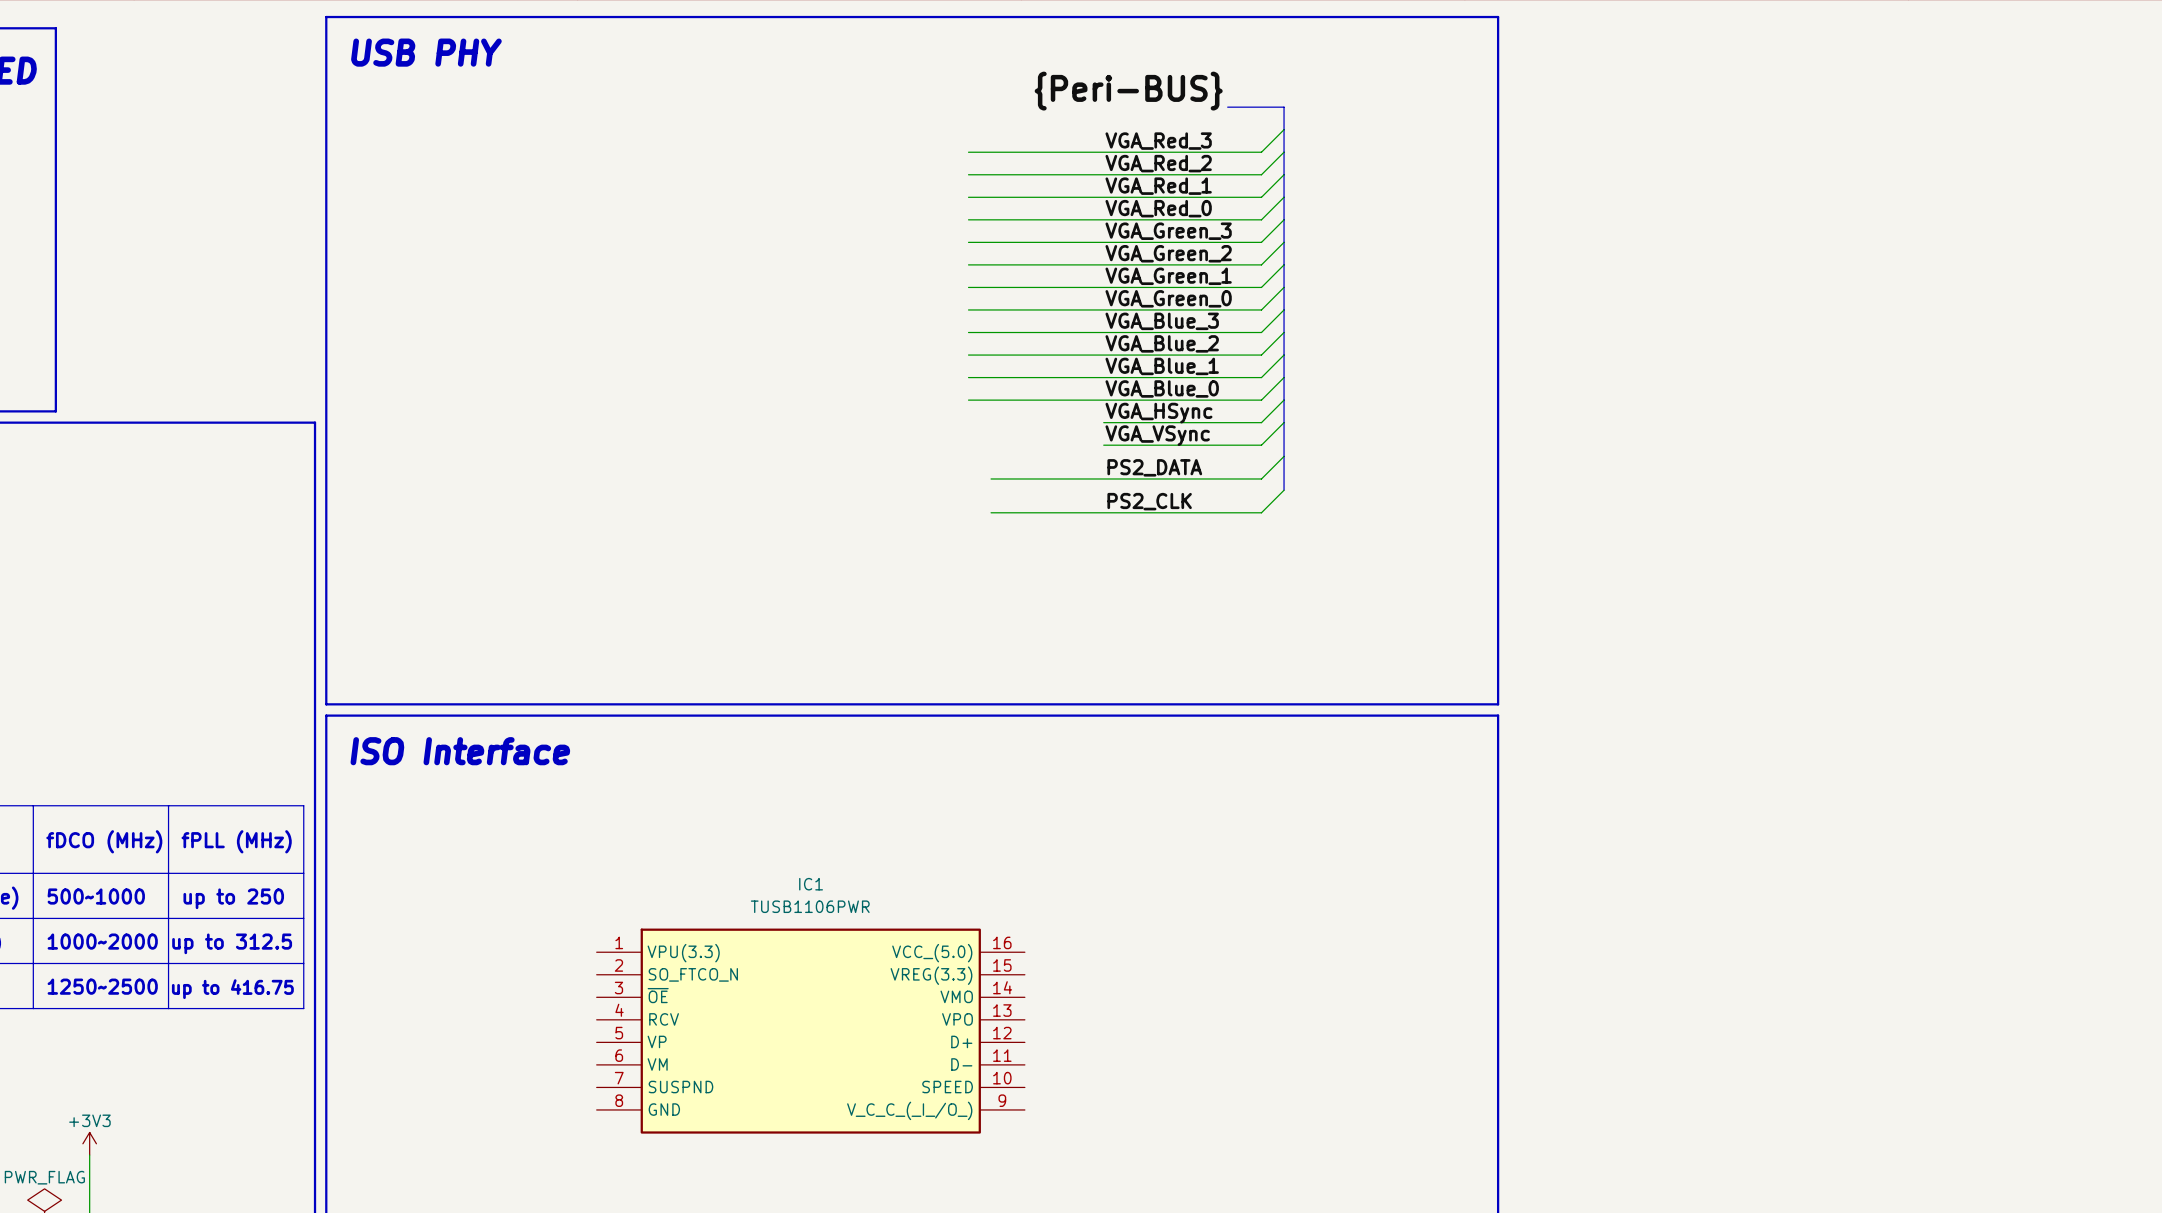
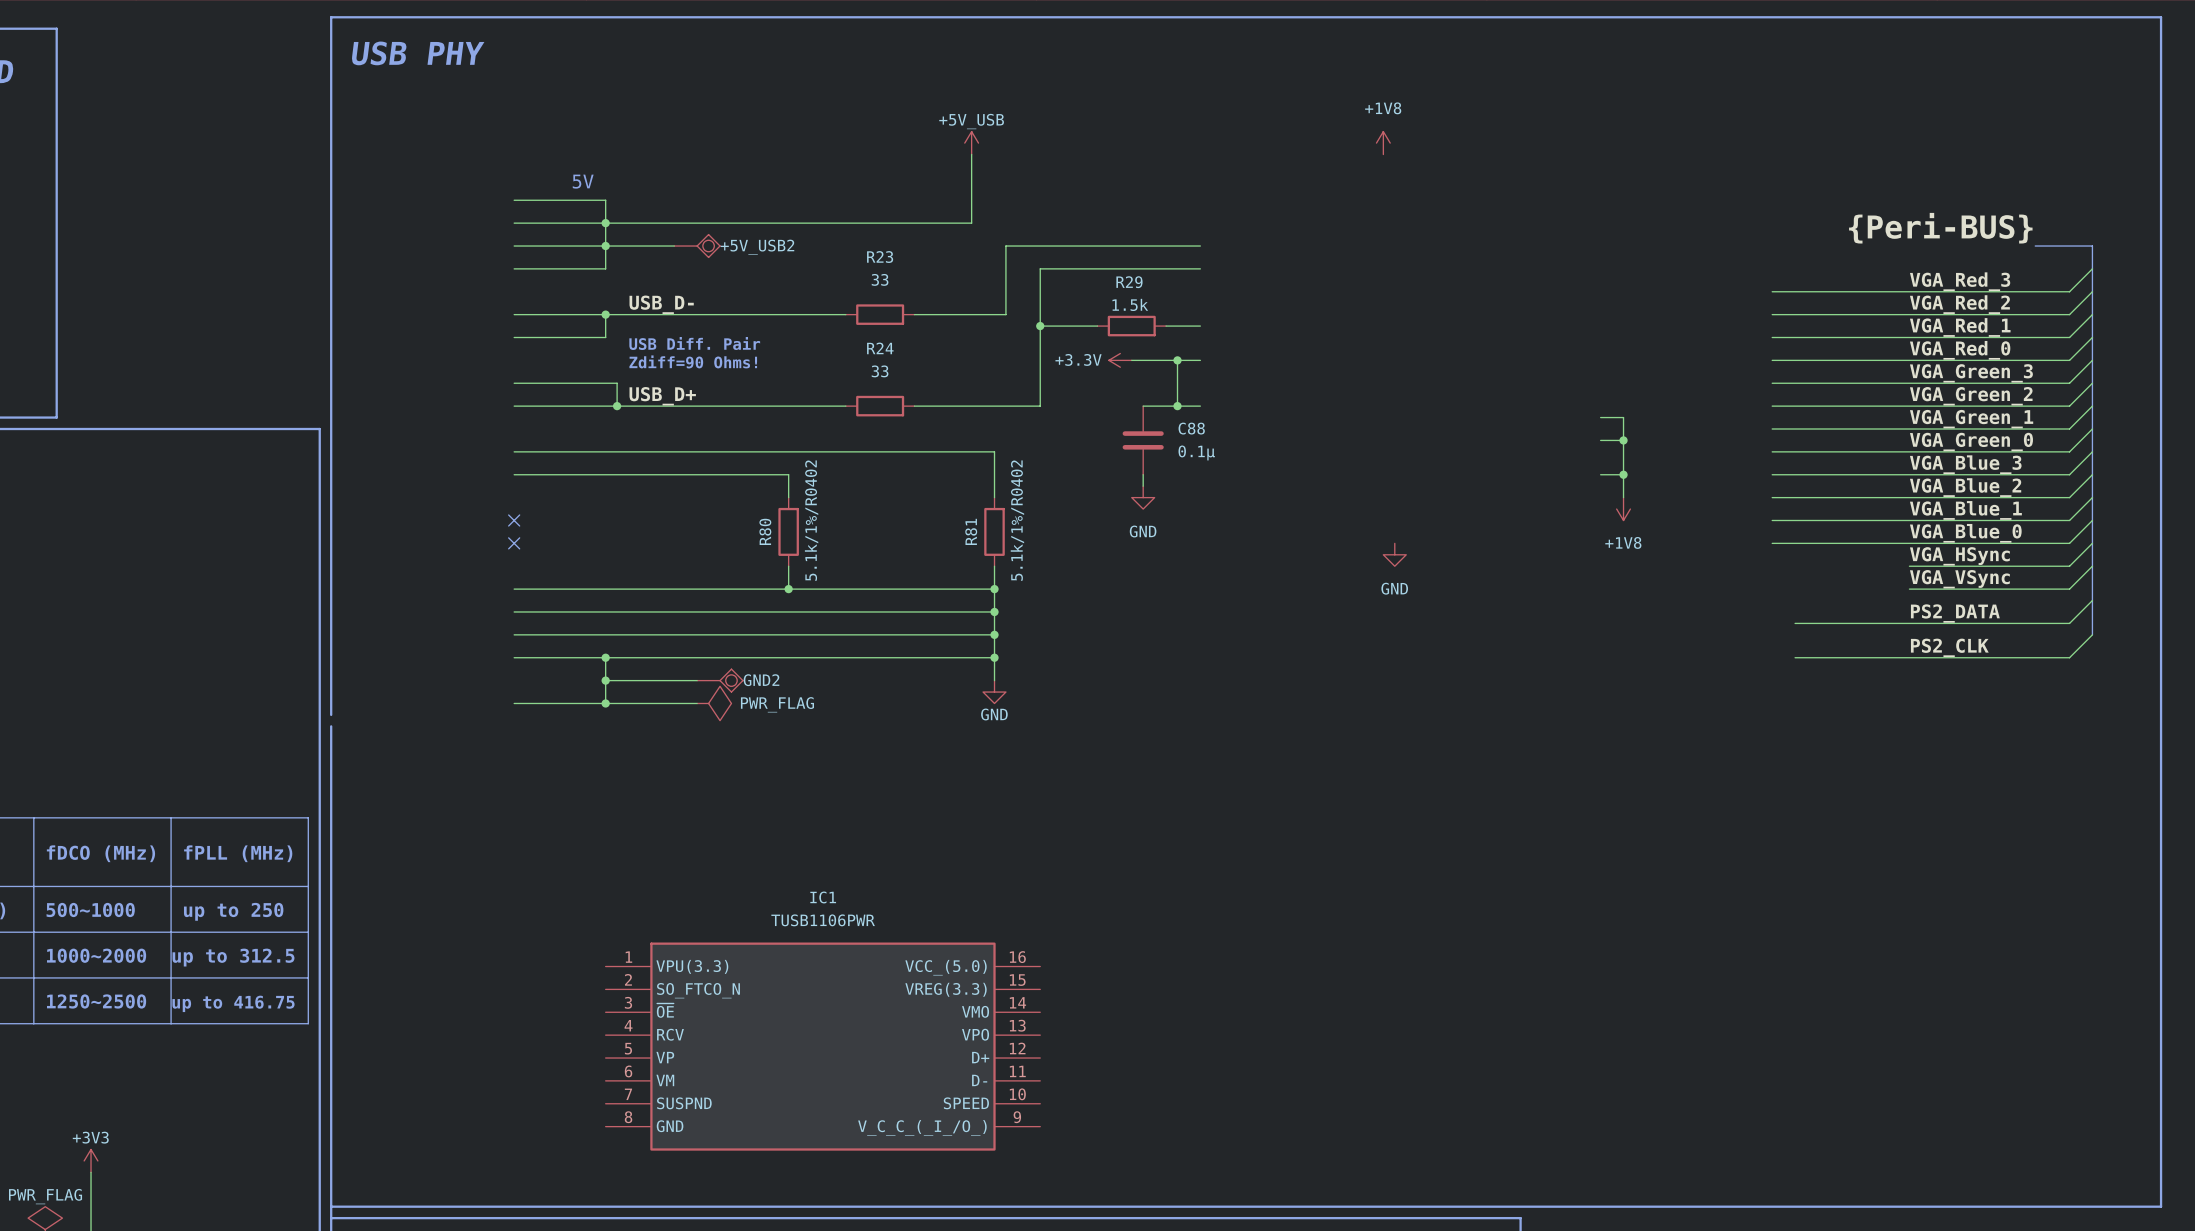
line: (1498, 17) (1498, 704) (326, 704) -> (1520, 17) (2161, 17) (2161, 1206) (331, 1206)
label: {Peri-BUS} (1128, 91) -> none
bus: (1227, 107) (1284, 107) (1284, 490) -> none
wire: (1284, 129) (1261, 152) (968, 152) -> none
power symbol: none -> +5V_USB (971, 143)
power symbol: none -> +1V8 (1383, 143)
label: VGA_Red_3 (1158, 141) -> none
wire: none -> (971, 154) (971, 223) (514, 223)
wire: (1284, 152) (1261, 174) (968, 174) -> none
label: VGA_Red_2 (1158, 163) -> none
wire: (1284, 174) (1261, 197) (968, 197) -> none
text: none -> 5V (583, 181)
label: VGA_Red_1 (1158, 186) -> none
wire: none -> (514, 200) (605, 200) (605, 268) (514, 268)
wire: (1284, 197) (1261, 219) (968, 219) -> none
label: VGA_Red_0 (1158, 208) -> none
junction: none -> (605, 223)
wire: (1284, 219) (1261, 242) (1182, 242) -> none
label: none -> {Peri-BUS} (1940, 228)
label: VGA_Green_3 (1168, 231) -> none
wire: none -> (514, 246) (674, 246)
junction: none -> (605, 246)
+5V_USB2: none -> (697, 246)
wire: (968, 242) (991, 242) -> (1005, 314) (1005, 246)
wire: (1284, 242) (1261, 264) (1182, 264) -> none
bus: none -> (2035, 246) (2092, 246) (2092, 634)
label: VGA_Green_2 (1168, 253) -> none
wire: (968, 264) (1024, 264) -> (1040, 406) (1040, 268)
wire: (1284, 264) (1261, 287) (968, 287) -> none
wire: none -> (2092, 268) (2069, 291) (1772, 291)
label: VGA_Green_1 (1168, 276) -> none
label: none -> VGA_Red_3 (1960, 281)
wire: (1284, 287) (1261, 309) (991, 309) -> none
wire: none -> (2092, 291) (2069, 314) (1772, 314)
label: none -> USB_D- (661, 304)
label: VGA_Green_0 (1168, 298) -> none
label: none -> VGA_Red_2 (1959, 304)
wire: none -> (514, 314) (845, 314)
wire: none -> (605, 314) (605, 337) (514, 337)
junction: none -> (605, 314)
R23: none -> 33 (880, 314)
wire: none -> (914, 314) (983, 314)
wire: (1284, 309) (1261, 332) (968, 332) -> none
wire: none -> (2092, 314) (2069, 337) (1772, 337)
wire: none -> (1040, 326) (1097, 326)
junction: none -> (1040, 326)
R29: none -> 1.5k (1131, 326)
wire: none -> (1166, 326) (1200, 326)
label: VGA_Blue_3 (1162, 321) -> none
label: none -> VGA_Red_1 (1960, 327)
wire: (1284, 332) (1261, 355) (1182, 355) -> none
wire: none -> (2092, 337) (2069, 360) (1772, 360)
text: none -> USB Diff. Pair (694, 343)
label: VGA_Blue_2 (1162, 343) -> none
label: none -> VGA_Red_0 (1960, 350)
wire: (968, 355) (1115, 355) -> none
power symbol: none -> +3.3V (1120, 360)
wire: none -> (1177, 360) (1177, 406)
junction: none -> (1177, 360)
wire: (1284, 355) (1261, 377) (968, 377) -> none
wire: none -> (2092, 360) (2069, 383) (1772, 383)
text: none -> Zdiff=90 Ohms! (693, 361)
label: VGA_Blue_1 (1162, 366) -> none
label: none -> VGA_Green_3 (1971, 373)
wire: none -> (514, 383) (617, 383) (617, 406)
wire: (1284, 377) (1261, 400) (1182, 400) -> none
wire: none -> (2092, 383) (2069, 406) (1772, 406)
label: none -> USB_D+ (662, 396)
label: VGA_Blue_0 (1162, 388) -> none
label: none -> VGA_Green_2 (1971, 396)
wire: none -> (514, 406) (845, 406)
junction: none -> (617, 406)
R24: none -> 33 (880, 406)
wire: none -> (914, 406) (983, 406)
wire: (1024, 400) (1126, 400) -> none
junction: none -> (1177, 406)
wire: (1284, 400) (1261, 422) (1103, 422) -> none
wire: none -> (2092, 406) (2069, 428) (1772, 428)
wire: none -> (1600, 417) (1623, 417) (1623, 497)
label: none -> VGA_Green_1 (1971, 419)
label: VGA_HSync (1158, 413) -> none
wire: (1284, 422) (1261, 445) (1103, 445) -> none
wire: none -> (2092, 428) (2069, 451) (1772, 451)
C88: none -> 0.1µ (1143, 440)
wire: none -> (1600, 440) (1623, 440)
junction: none -> (1623, 440)
label: none -> VGA_Green_0 (1971, 441)
label: VGA_VSync (1157, 435) -> none
wire: none -> (514, 451) (994, 451) (994, 497)
wire: none -> (2092, 451) (2069, 474) (1772, 474)
wire: (1284, 456) (1261, 478) (991, 478) -> none
label: none -> VGA_Blue_3 (1965, 464)
wire: none -> (514, 474) (788, 474) (788, 497)
wire: none -> (1143, 474) (1143, 486)
label: PS2_DATA (1154, 467) -> none
wire: none -> (1600, 474) (1623, 474)
junction: none -> (1623, 474)
wire: none -> (2092, 474) (2069, 497) (1772, 497)
label: none -> VGA_Blue_2 (1965, 487)
power symbol: none -> GND (1143, 497)
wire: (1284, 490) (1261, 512) (991, 512) -> none
wire: none -> (2092, 497) (2069, 520) (1772, 520)
label: PS2_CLK (1149, 501) -> none
power symbol: none -> +1V8 (1623, 509)
label: none -> VGA_Blue_1 (1965, 510)
no-connect mark: none -> (514, 520)
wire: none -> (2092, 520) (2069, 543) (1772, 543)
R80: none -> 5.1k/1%/R0402 (788, 531)
R81: none -> 5.1k/1%/R0402 (994, 531)
label: none -> VGA_Blue_0 (1965, 533)
no-connect mark: none -> (514, 543)
wire: none -> (2092, 543) (2069, 566) (1909, 566)
power symbol: none -> GND (1394, 554)
label: none -> VGA_HSync (1959, 556)
wire: none -> (788, 566) (788, 589)
wire: none -> (994, 566) (994, 680)
wire: none -> (2092, 566) (2069, 589) (1909, 589)
label: none -> VGA_VSync (1959, 579)
wire: none -> (514, 589) (994, 589)
junction: none -> (788, 589)
junction: none -> (994, 589)
wire: none -> (2092, 600) (2069, 623) (1795, 623)
wire: none -> (514, 611) (994, 611)
junction: none -> (994, 611)
label: none -> PS2_DATA (1955, 613)
wire: none -> (514, 634) (994, 634)
junction: none -> (994, 634)
wire: none -> (2092, 634) (2069, 657) (1795, 657)
label: none -> PS2_CLK (1949, 647)
wire: none -> (514, 657) (994, 657)
wire: none -> (605, 657) (605, 703)
junction: none -> (605, 657)
junction: none -> (994, 657)
wire: none -> (605, 680) (697, 680)
junction: none -> (605, 680)
GND2: none -> (720, 680)
power symbol: none -> GND (994, 692)
wire: none -> (514, 703) (697, 703)
junction: none -> (605, 703)
power symbol: none -> PWR_FLAG (714, 703)
line: (326, 715) (1498, 715) (1498, 1200) -> (331, 1218) (1520, 1218)
text: ISO Interface (460, 751) -> none

